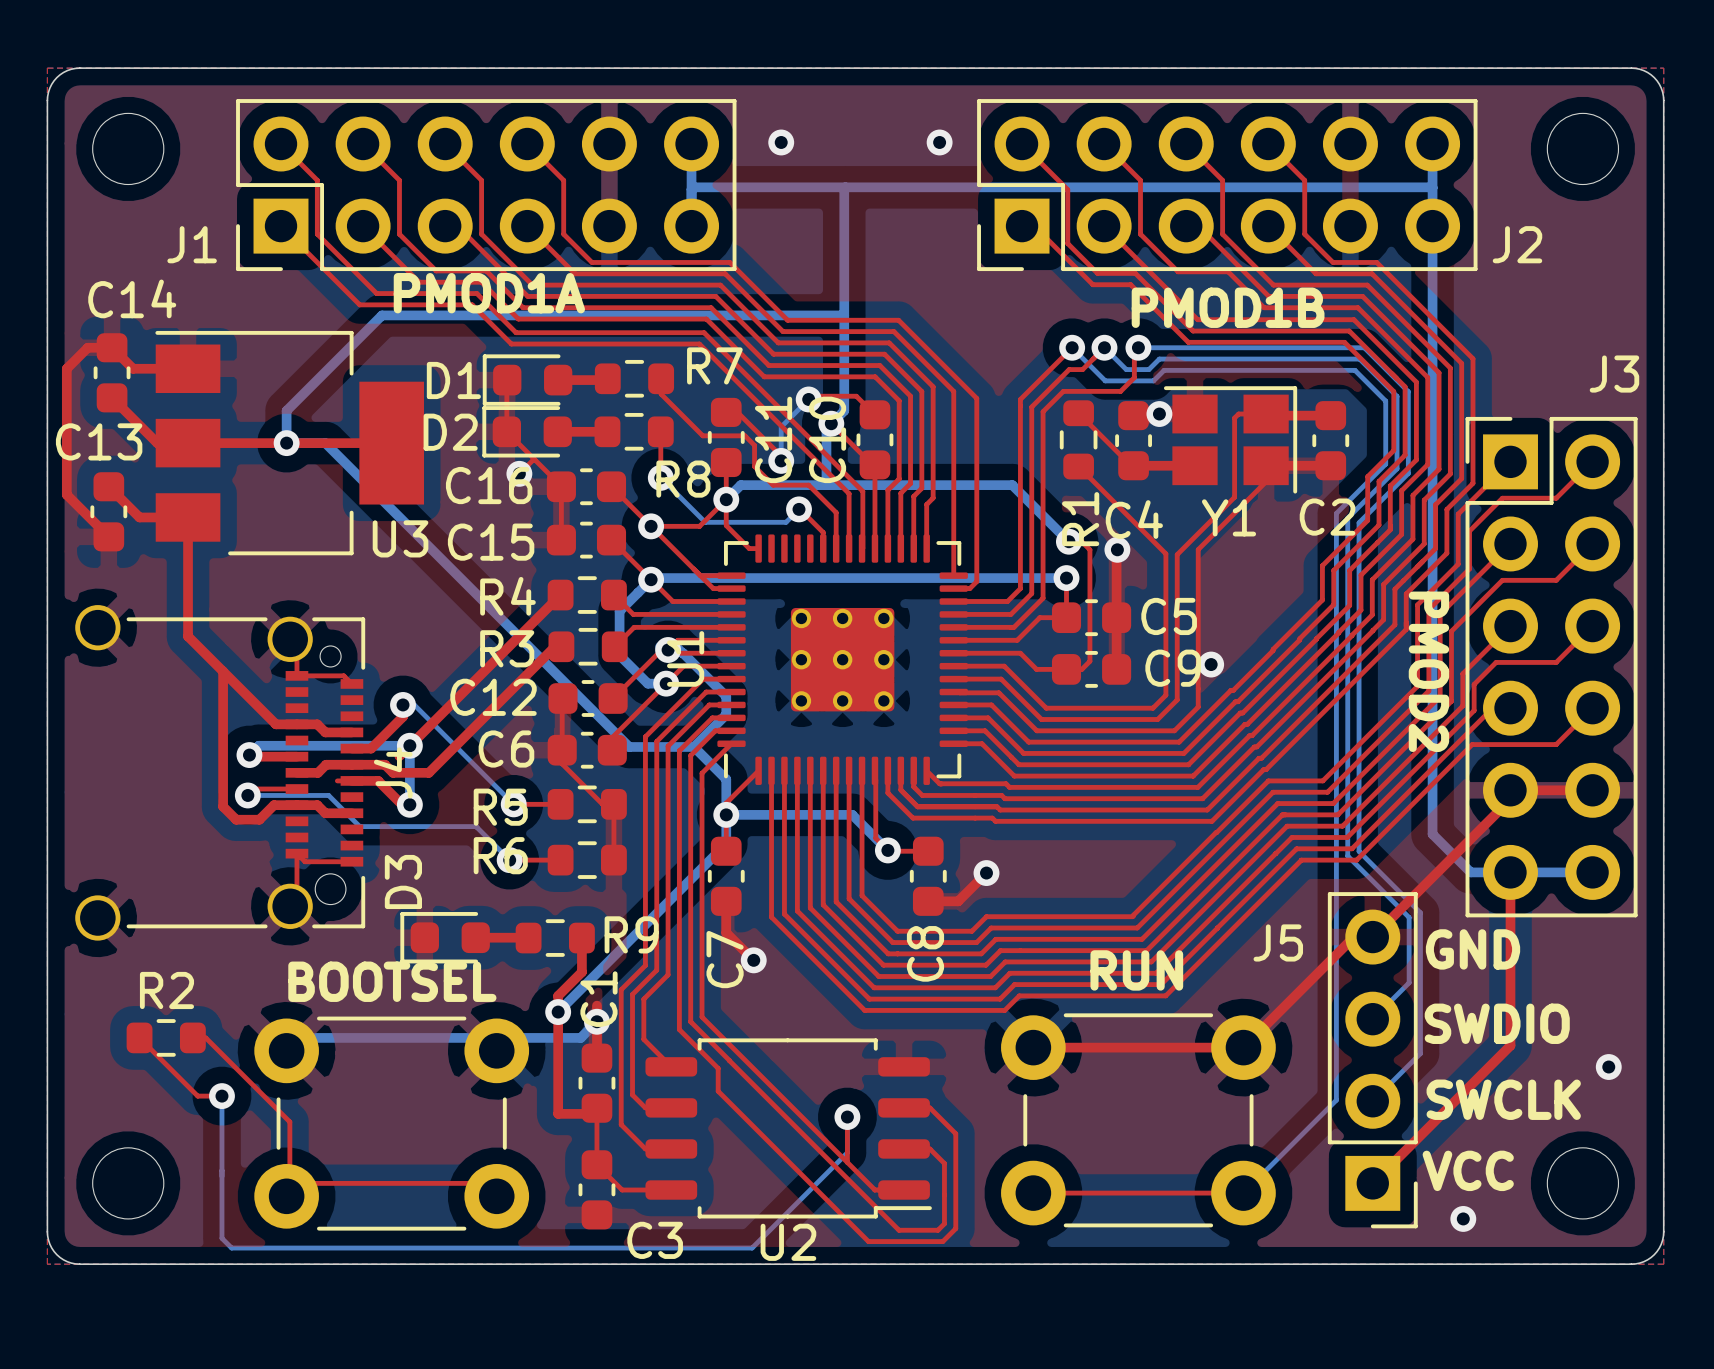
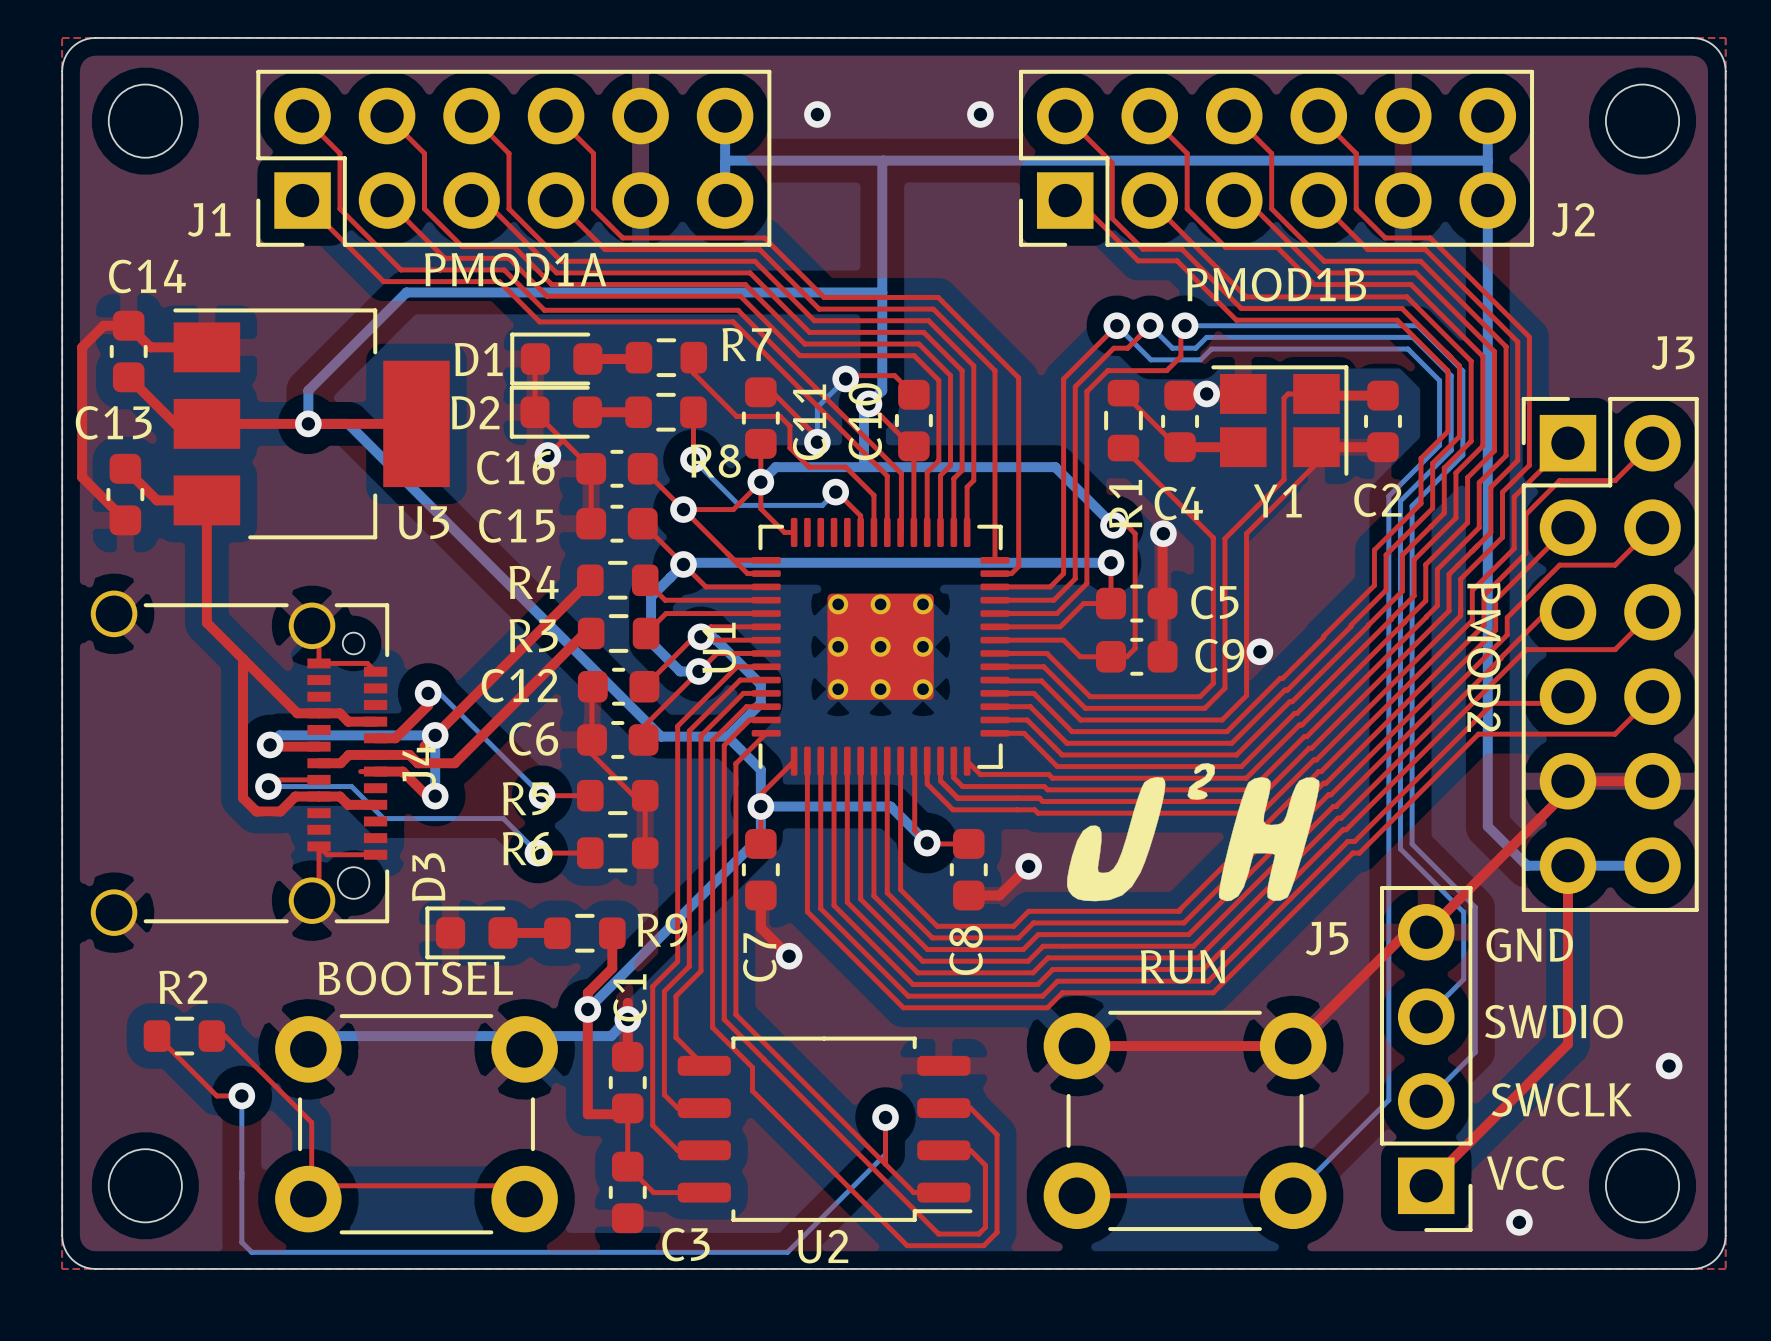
top track: (1510, 626) (1462, 673) (1462, 705) (1342, 826) (1290, 826) -> (1567, 612) (1546, 612) (1341, 818)
top track: (1417, 634) (1417, 686) (1322, 780) (1270, 780) -> (1472, 620) (1321, 771)
top track: (1428, 638) (1428, 690) (1327, 792) (1275, 792) -> (1483, 625) (1326, 783)
top track: (1440, 643) (1440, 696) (1333, 803) (1280, 803) -> (1495, 630) (1330, 794)
top track: (1451, 648) (1451, 701) (1337, 814) (1285, 814) -> (1507, 634) (1335, 806)
top track: (1496, 662) (1474, 684) (1474, 710) (1347, 837) (1294, 837) -> (1553, 649) (1526, 649) (1346, 829)
top track: (1510, 708) (1492, 708) (1351, 848) (1303, 848) -> (1567, 696) (1561, 703) (1492, 703) (1354, 841)
top track: (1472, 744) (1356, 860) (1307, 860) -> (1528, 734) (1478, 734) (1359, 853)
drawing: none -> [1066, 763, 1320, 902]

